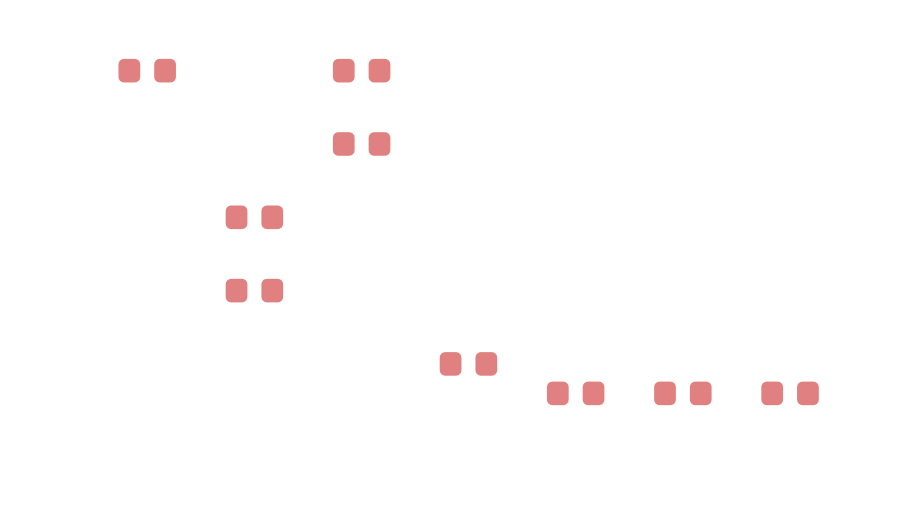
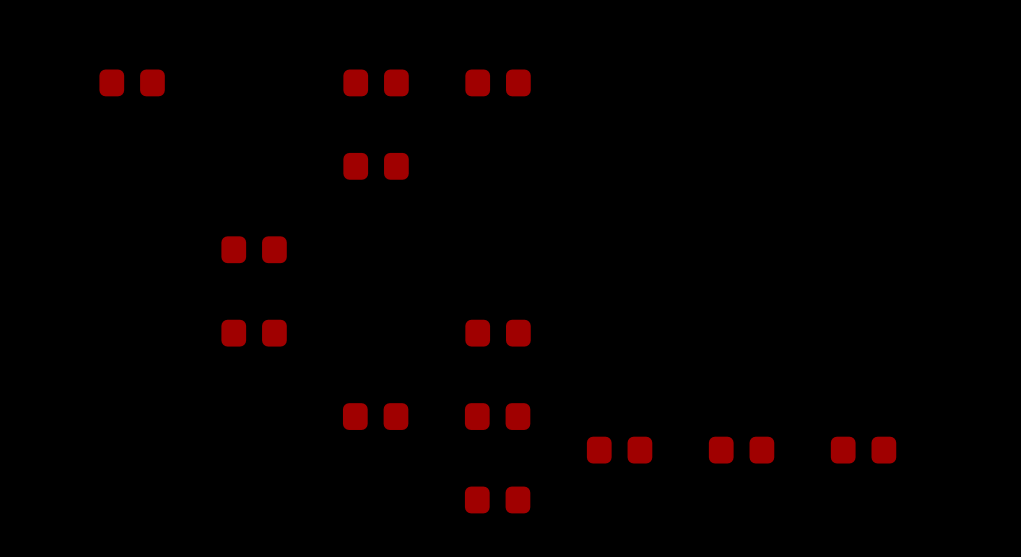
part: none -> (498, 82)
part: none -> (498, 333)
part: none -> (375, 416)
part: none -> (497, 499)

